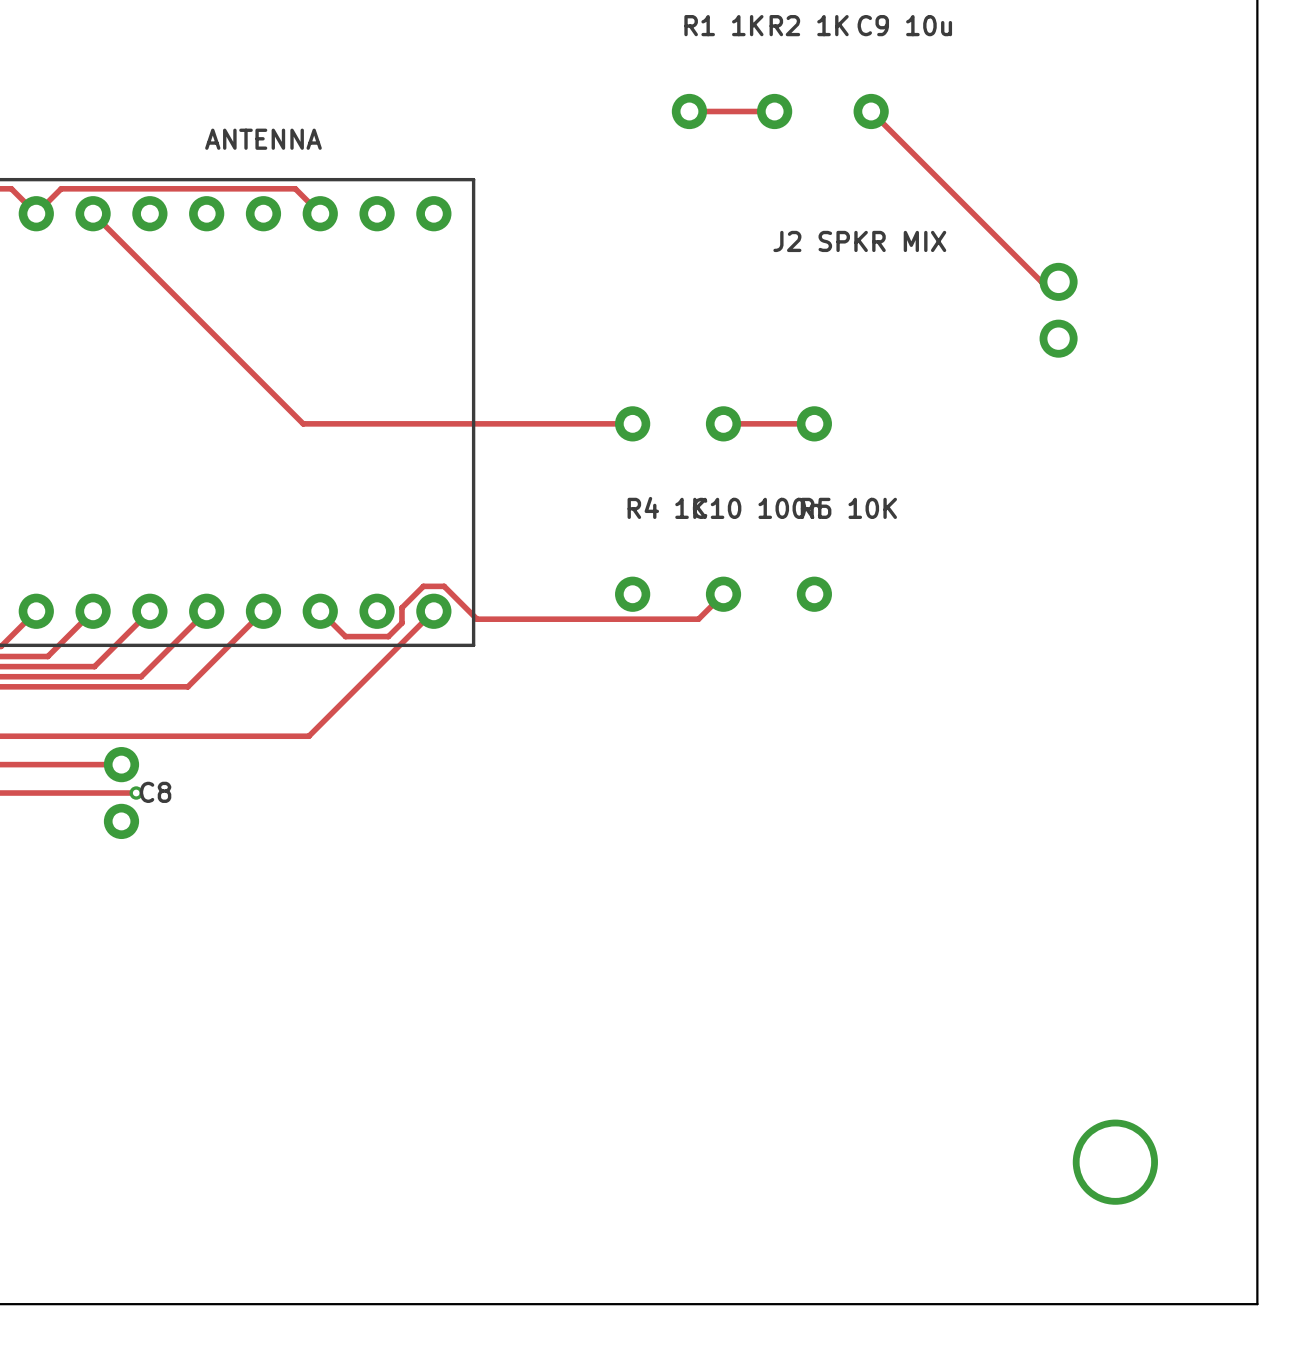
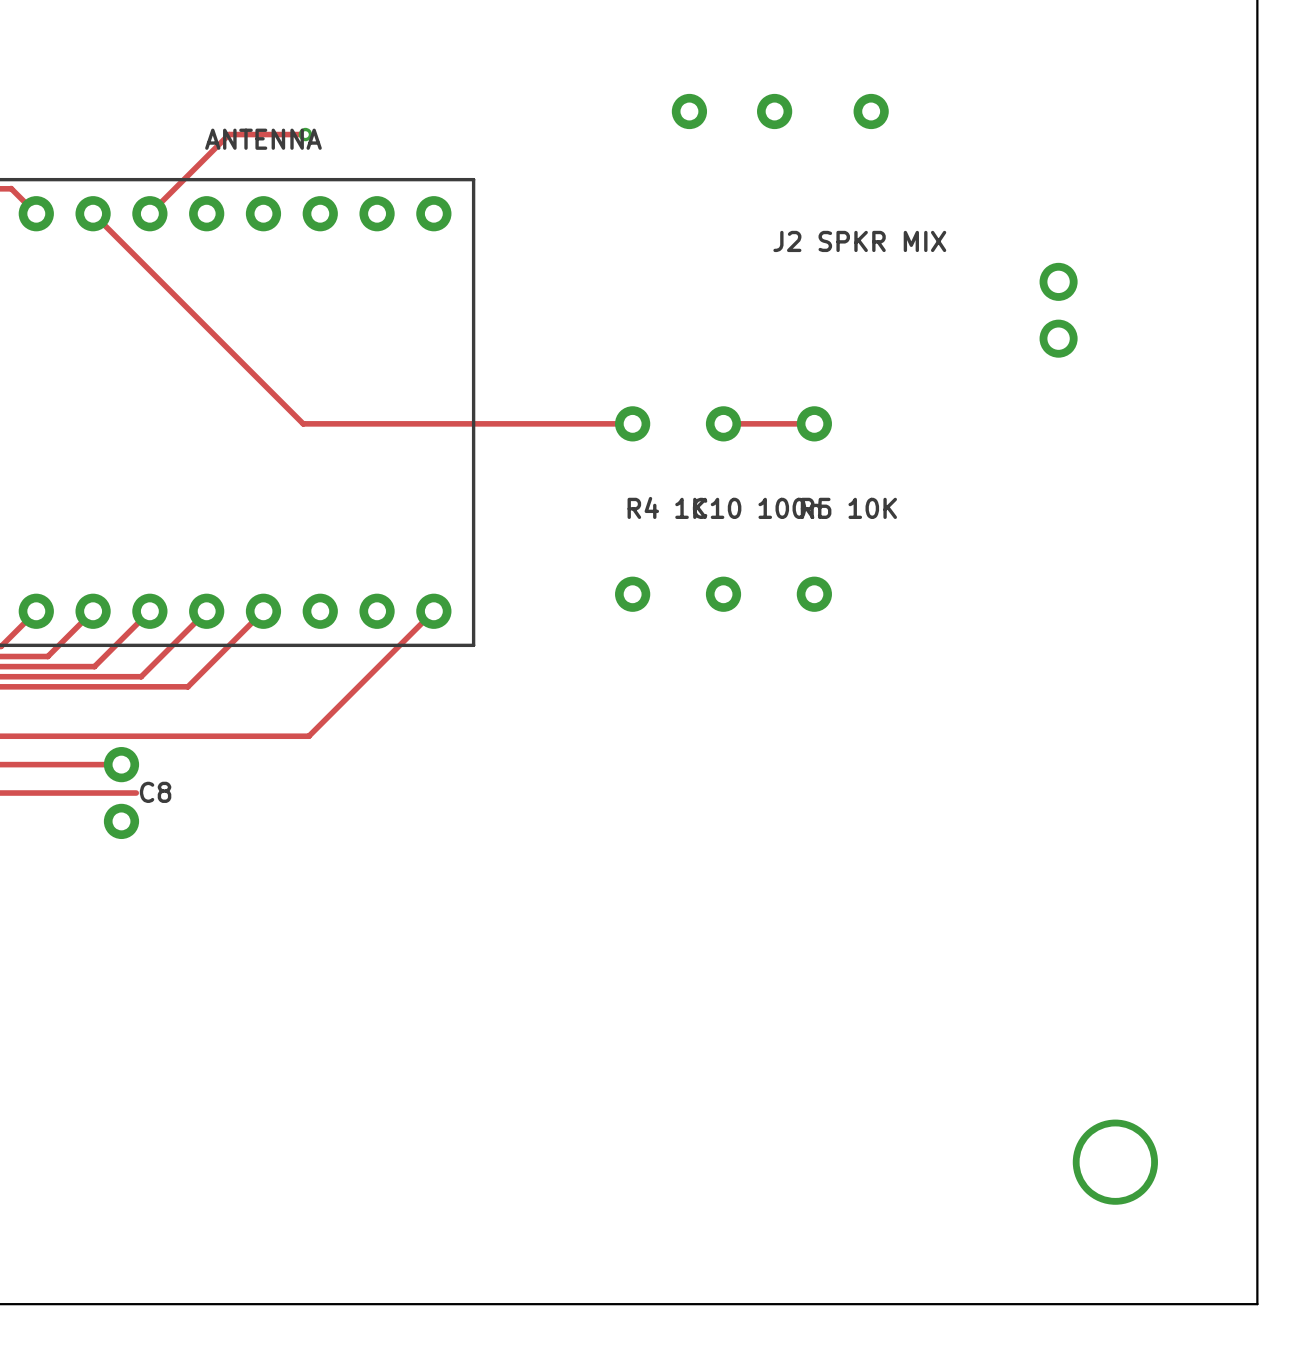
text: R1 1K (723, 25) -> none
text: R2 1K (809, 25) -> none
text: C9 10u (904, 25) -> none
track: (689, 111) (774, 111) -> none
track: (871, 111) (1041, 281) (1058, 281) -> none
track: none -> (305, 134) (229, 134) (149, 213)
via: none -> (305, 134)
track: (36, 213) (61, 188) (295, 188) (320, 213) -> none
track: (723, 594) (698, 619) (477, 619) (444, 586) (423, 586) (401, 607) (401, 623) (388, 636) (345, 636) (320, 611) -> none
via: (136, 793) -> none

